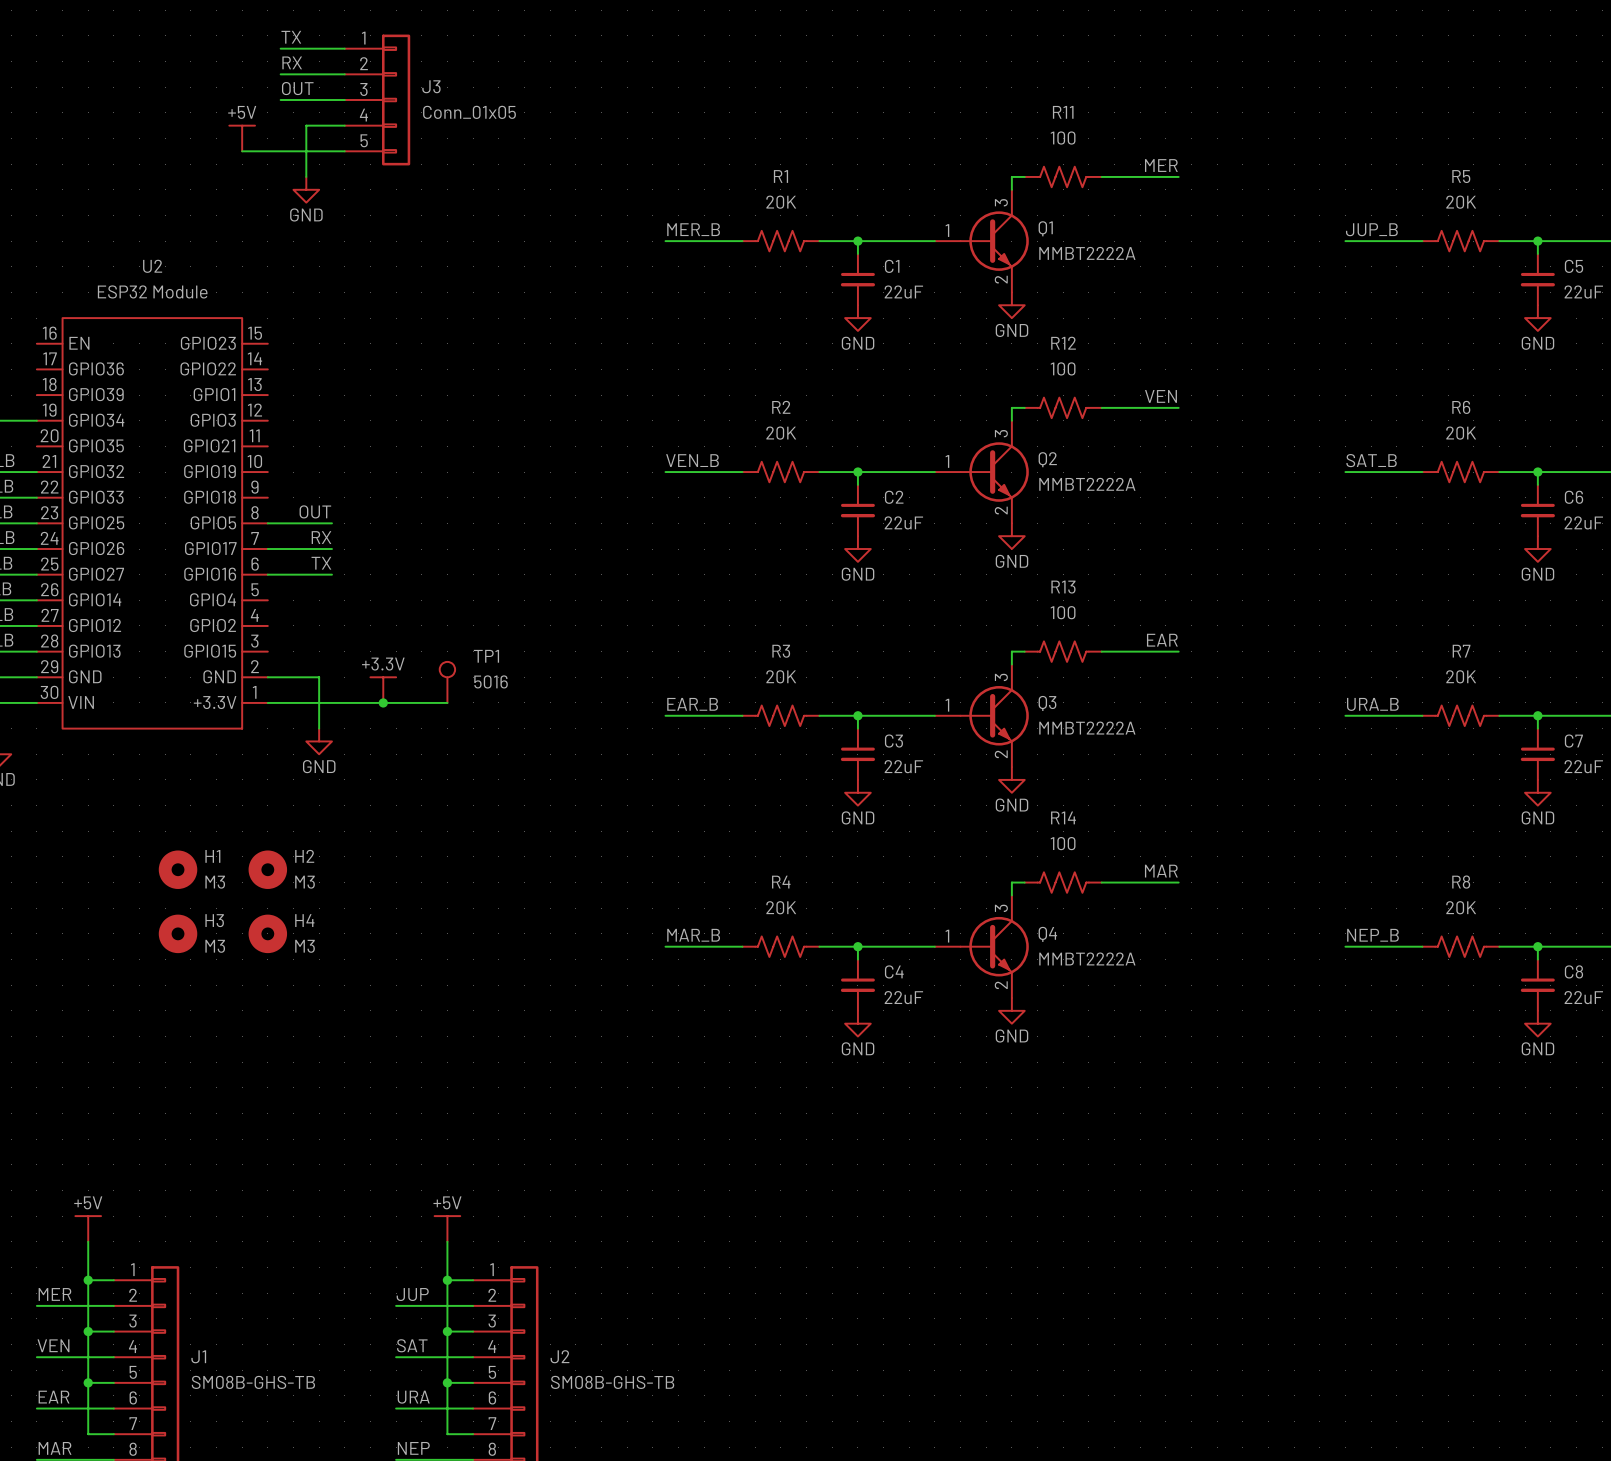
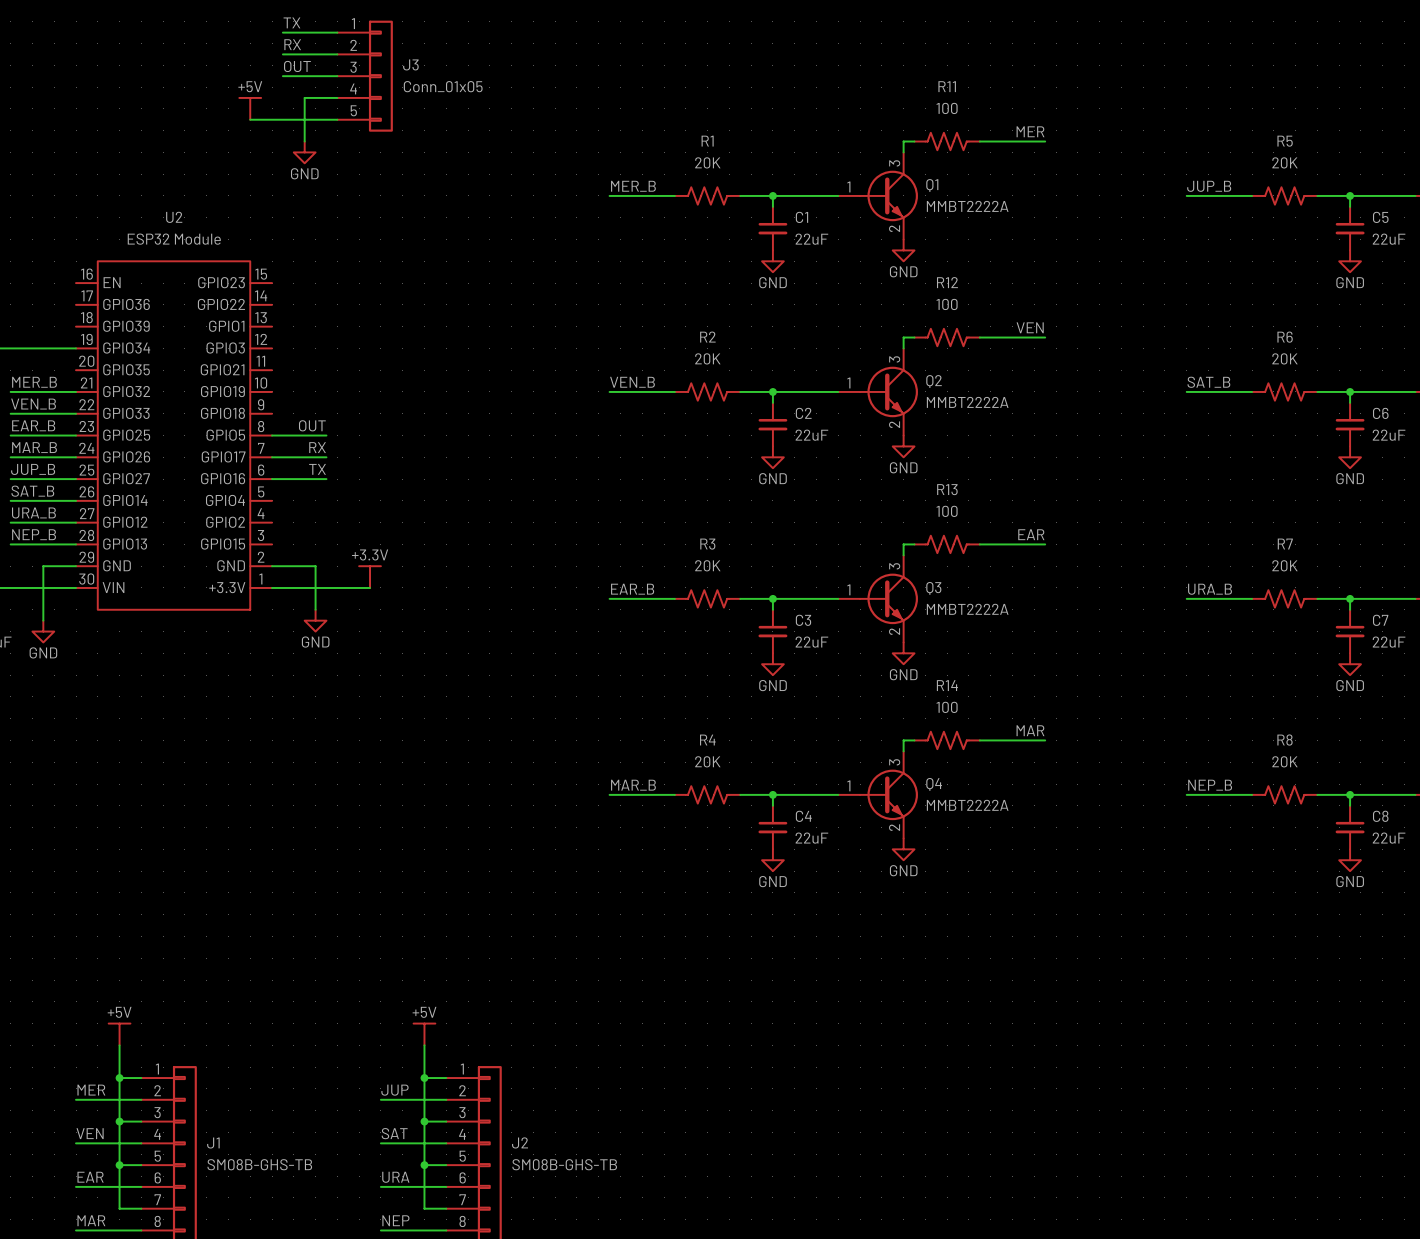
TP1: 5016 (447, 682) -> none
wire: (383, 702) (447, 702) -> none
junction: (383, 702) -> none
H1: M3 (178, 869) -> none
H2: M3 (267, 869) -> none
H3: M3 (178, 933) -> none
H4: M3 (267, 933) -> none

